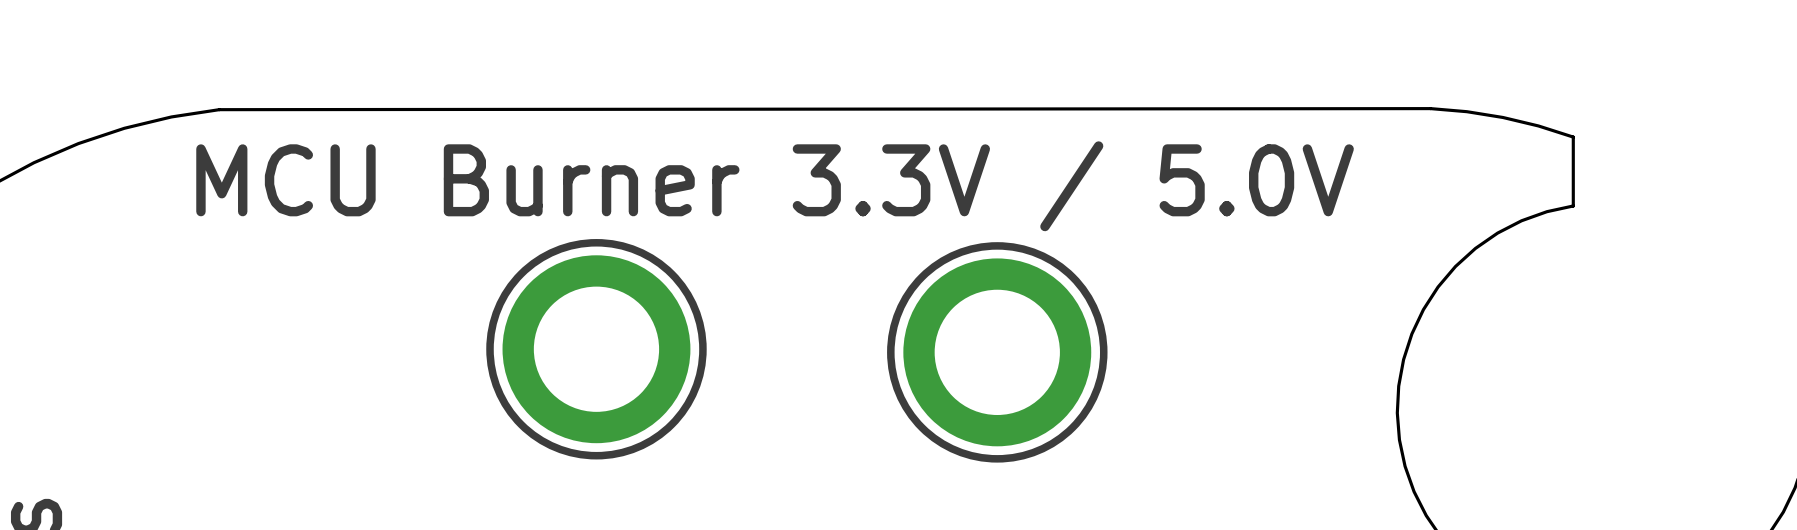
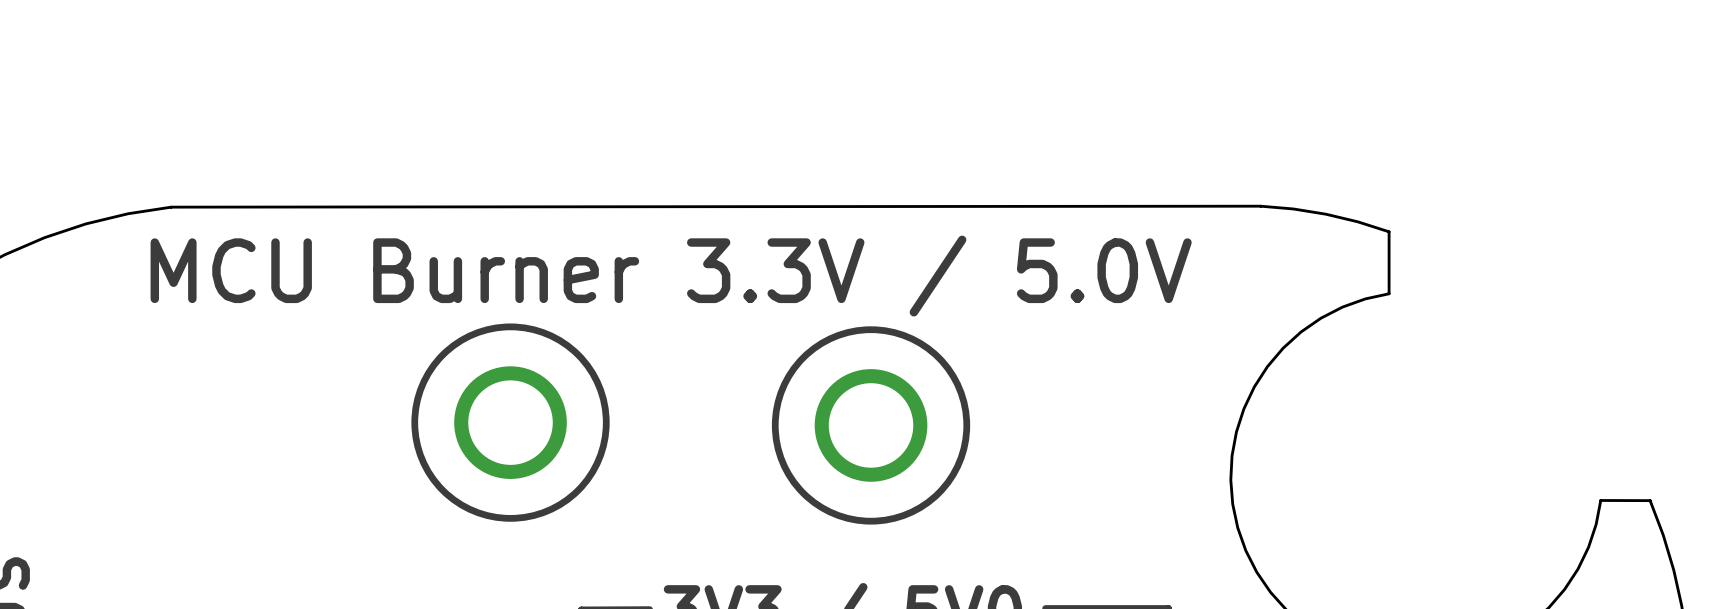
part footprint: [486, 239, 707, 460] -> [411, 323, 610, 522]
part footprint: [887, 242, 1108, 463] -> [771, 326, 971, 525]

